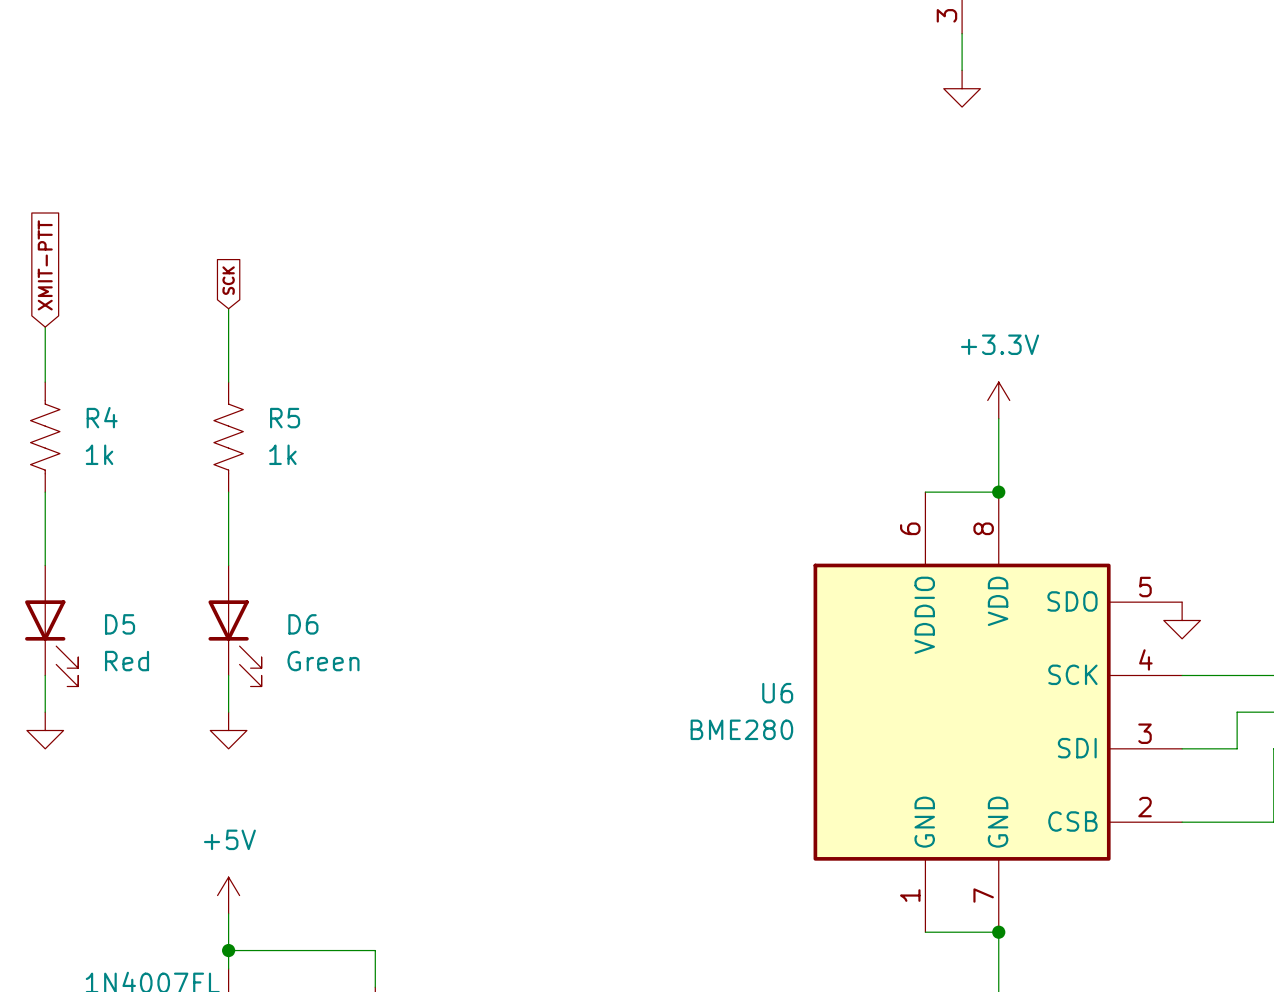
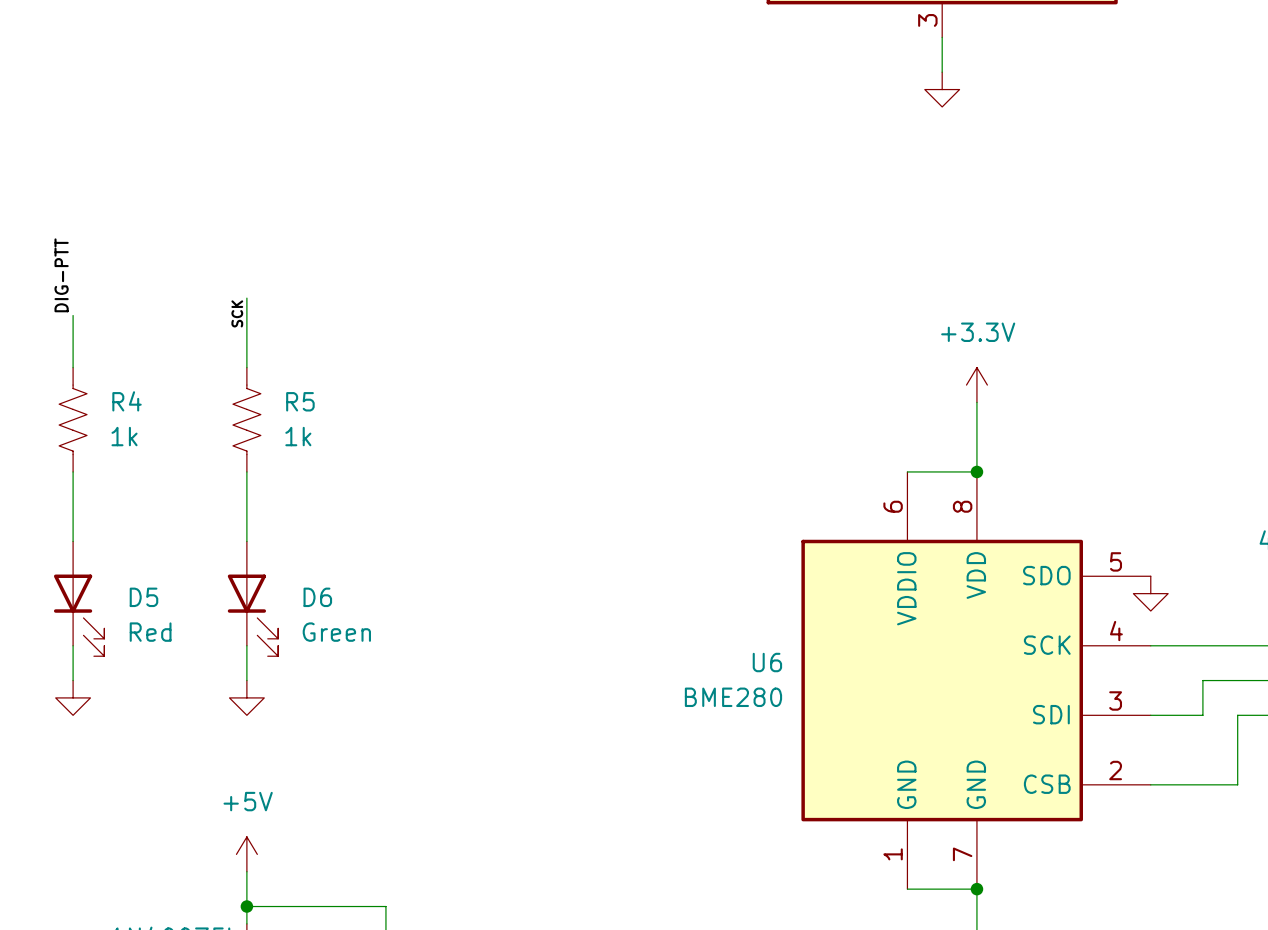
global label: XMIT-PTT (45, 265) -> none
global label: SCK (228, 280) -> none
label: none -> DIG-PTT (61, 275)
label: none -> SCK (237, 313)

